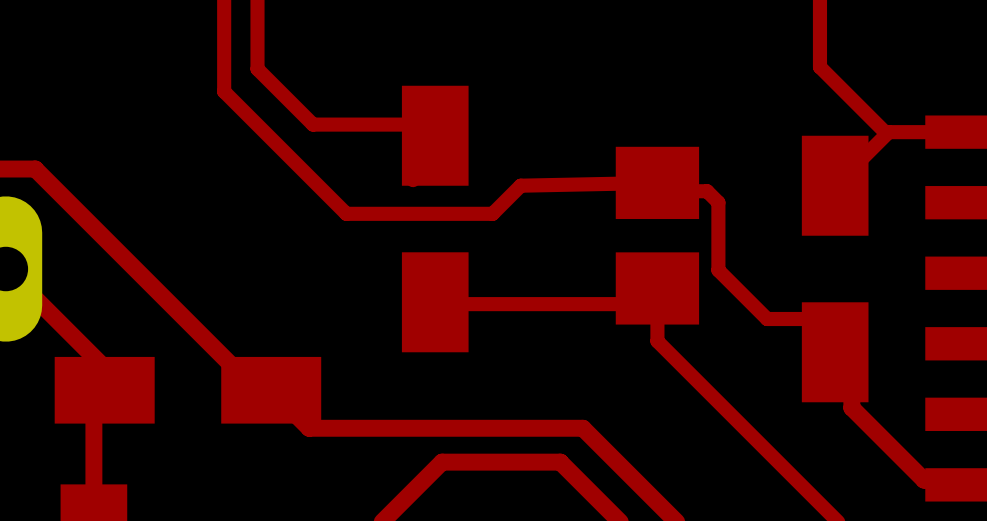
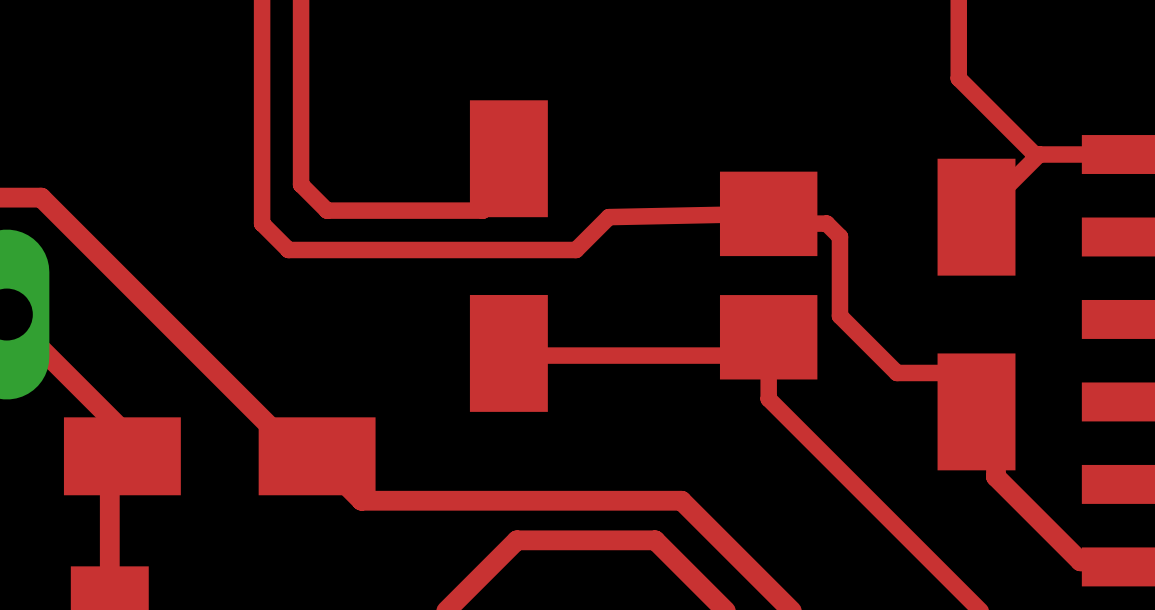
top track: (257, 69) (313, 124) (424, 124) (435, 135) -> (301, 80) (301, 184) (327, 210) (482, 210)
top track: (224, 91) (346, 213) -> (262, 107) (262, 223) (288, 250) (404, 250)

